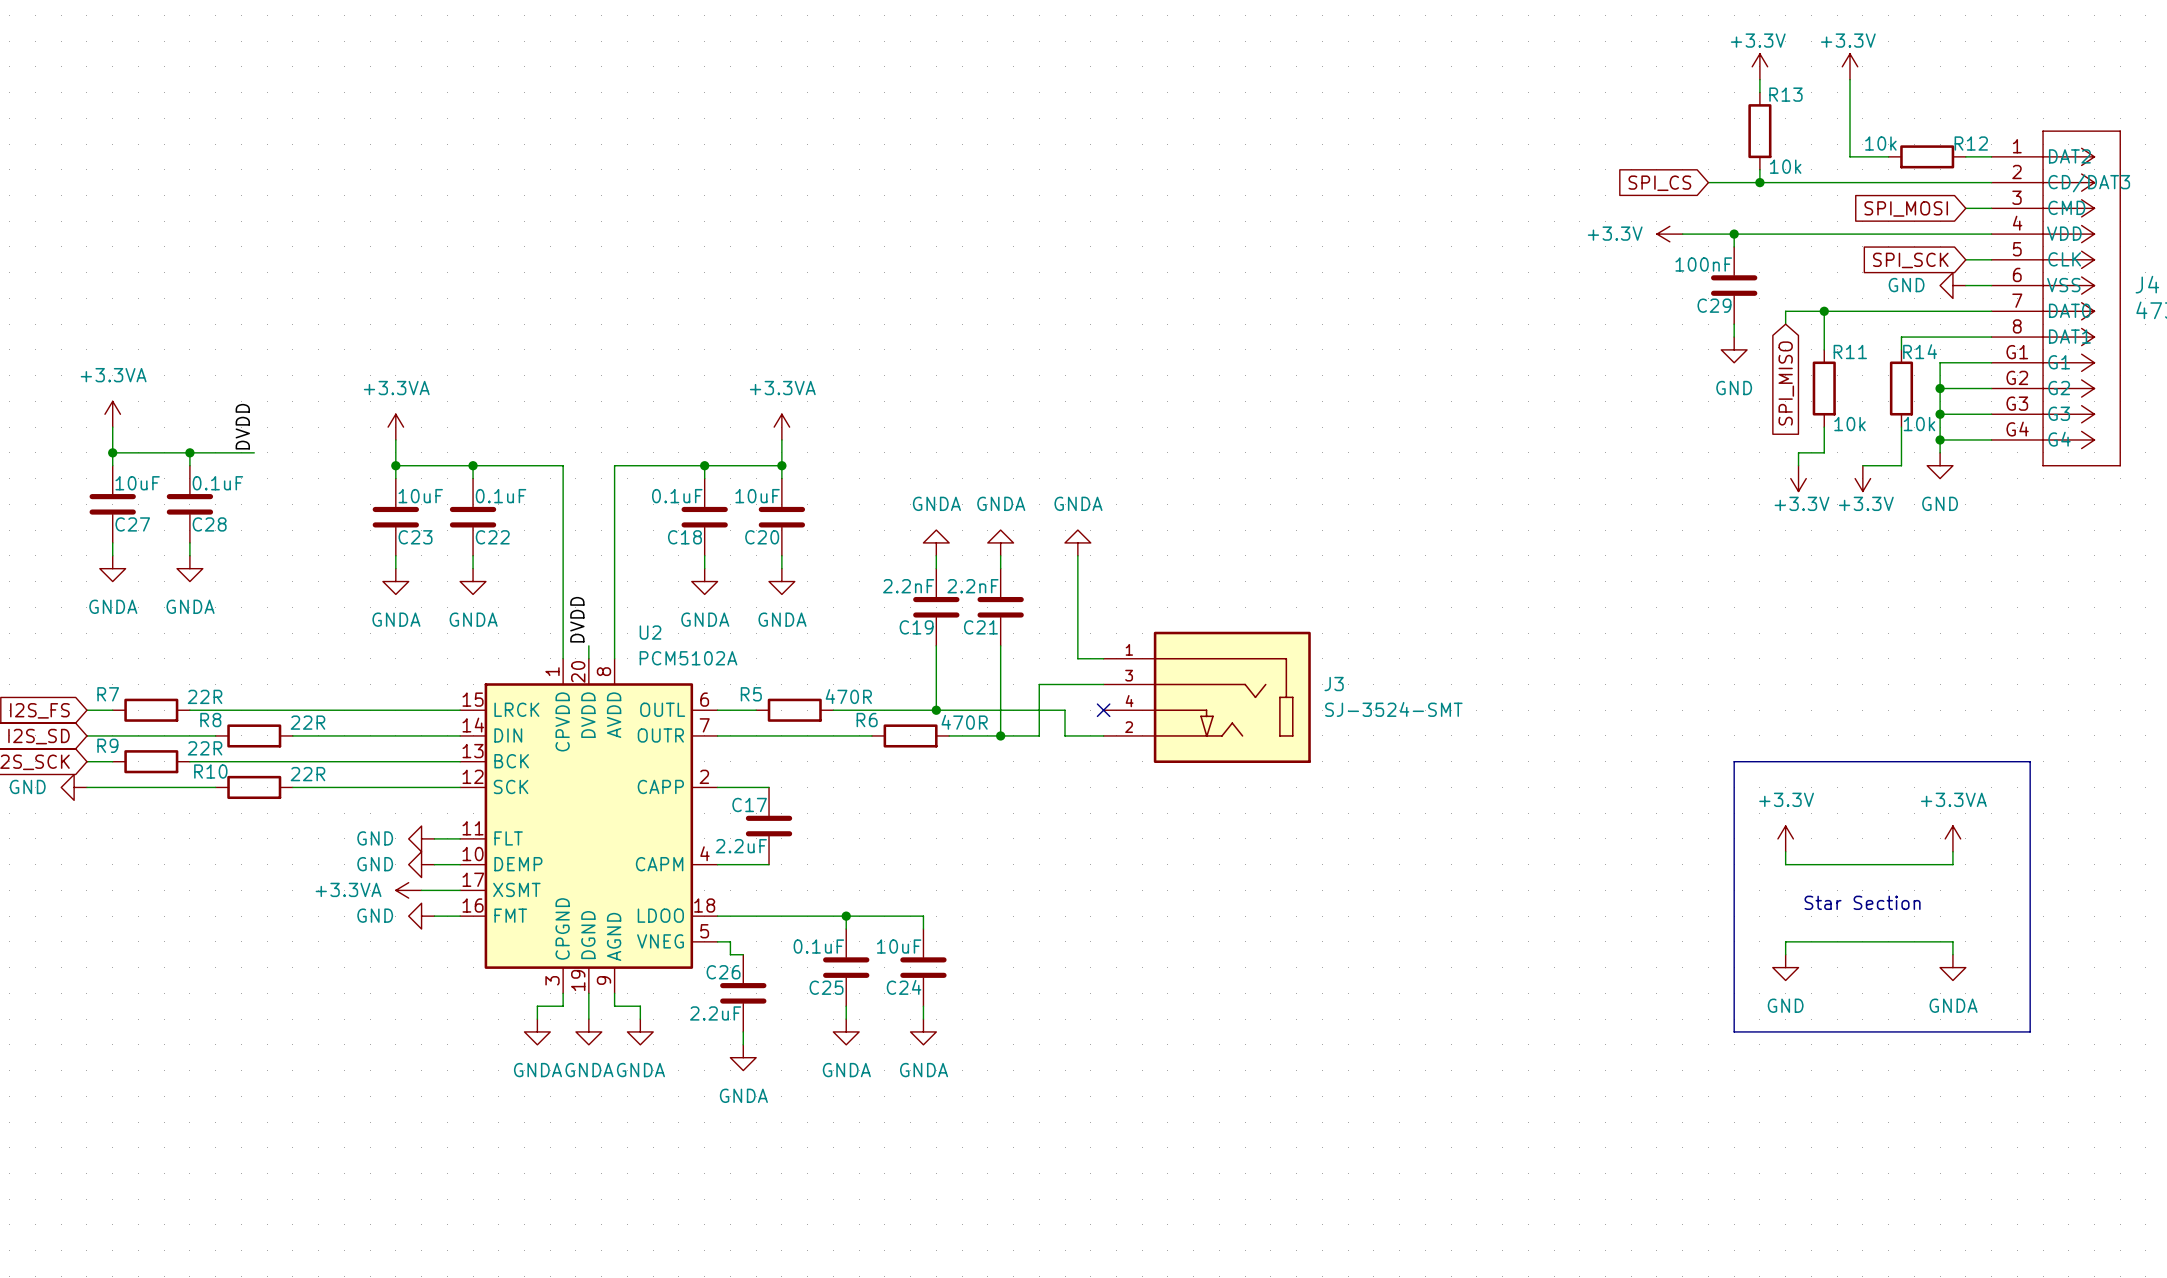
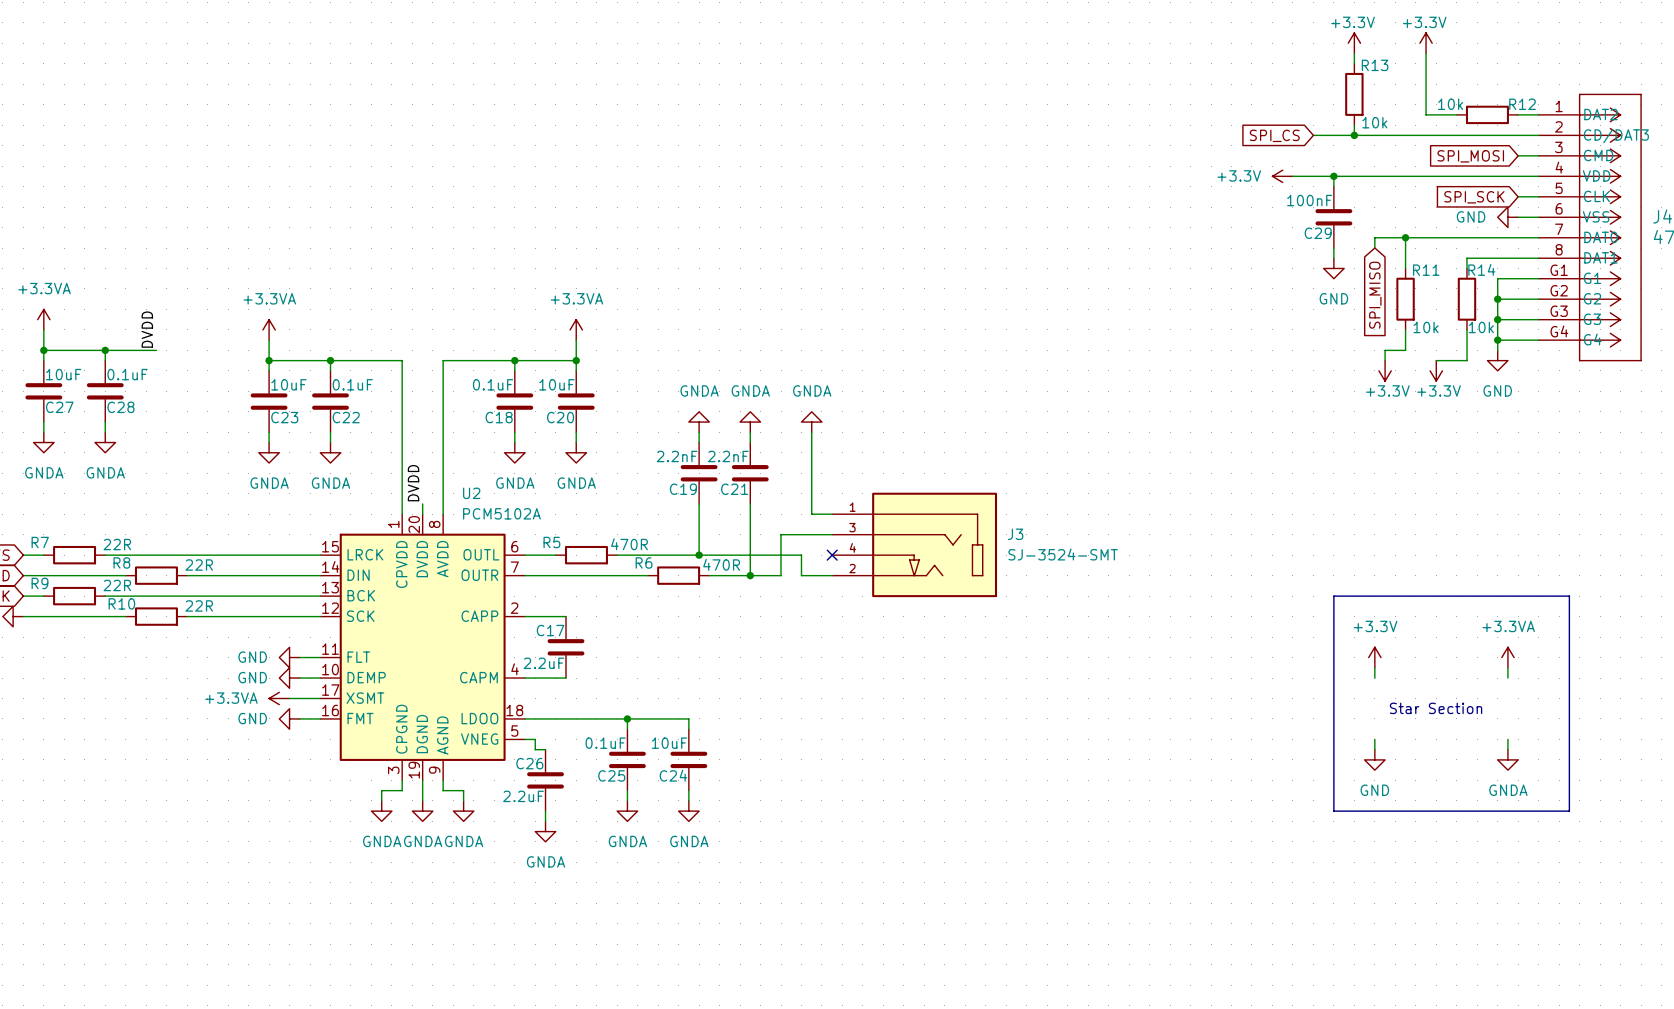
wire: (1785, 864) (1952, 864) -> none
wire: (1785, 941) (1952, 941) -> none

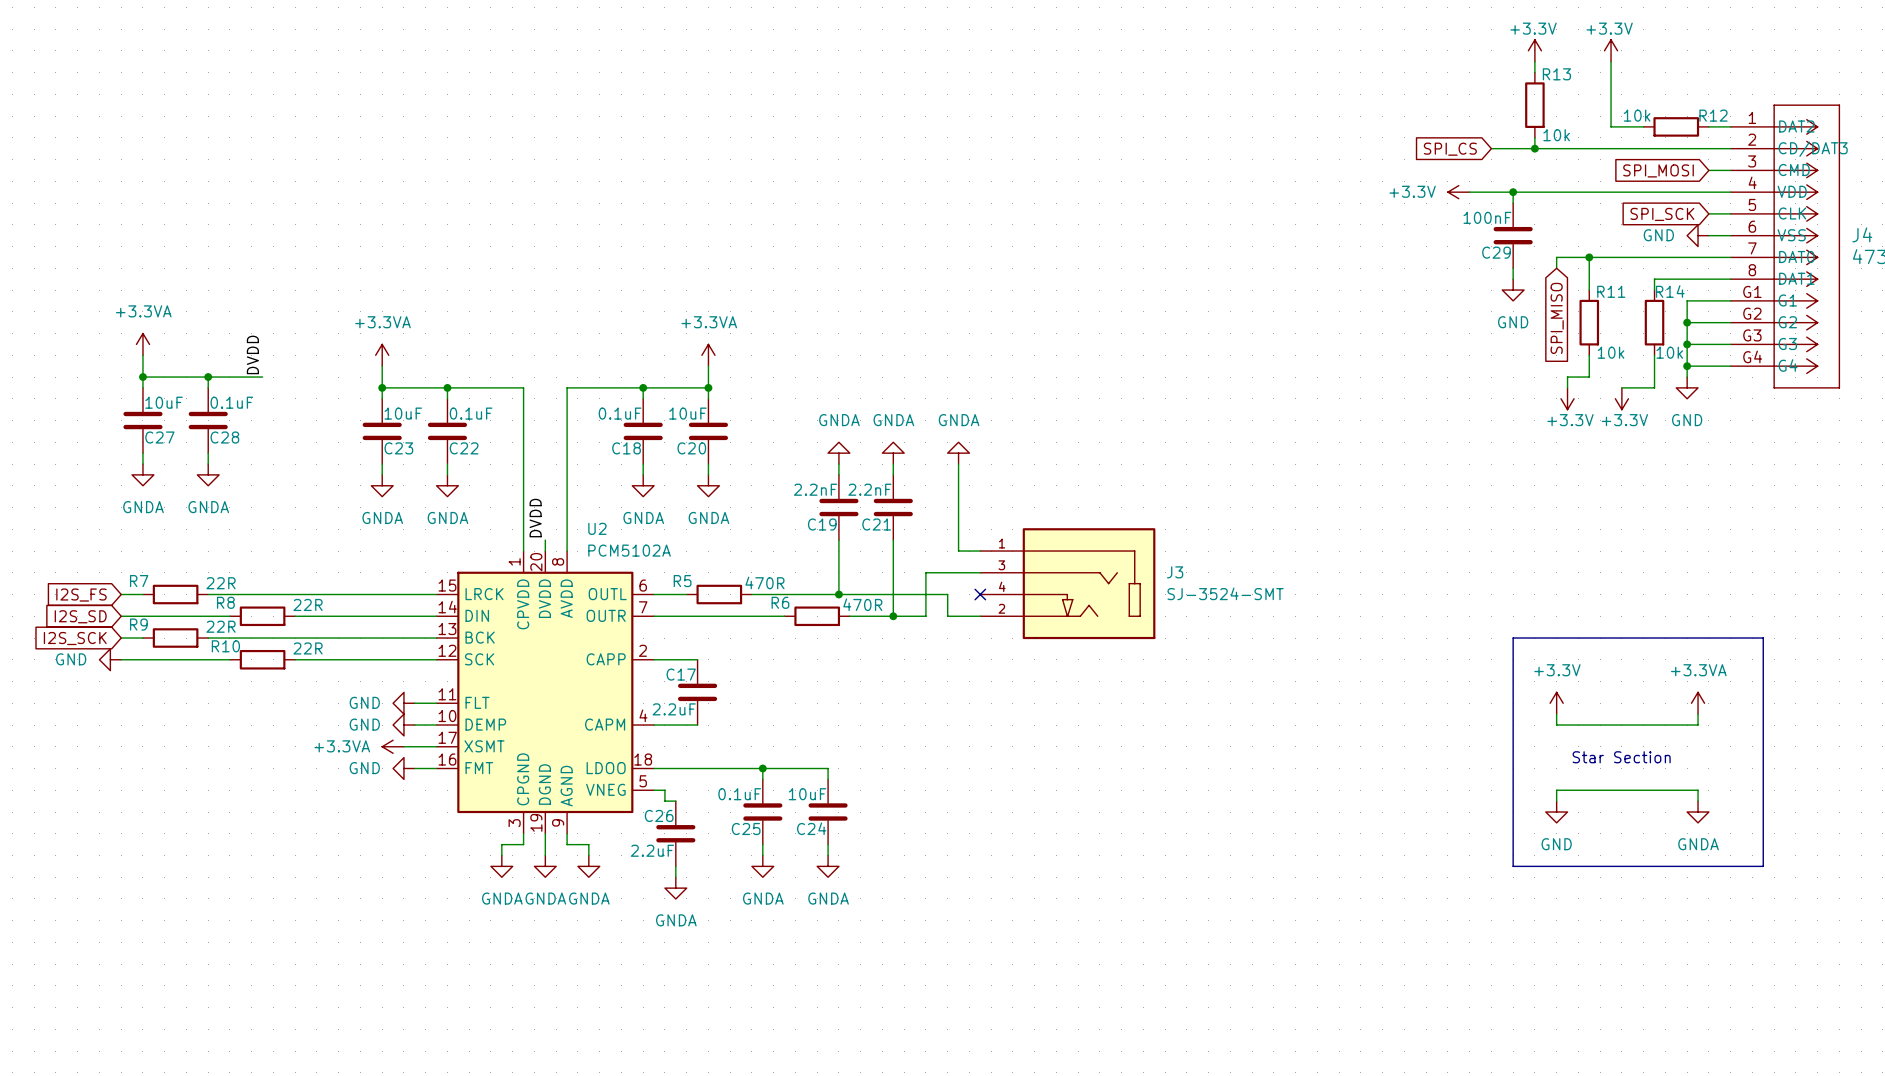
wire: none -> (1556, 725) (1698, 725)
wire: none -> (1556, 790) (1698, 790)

